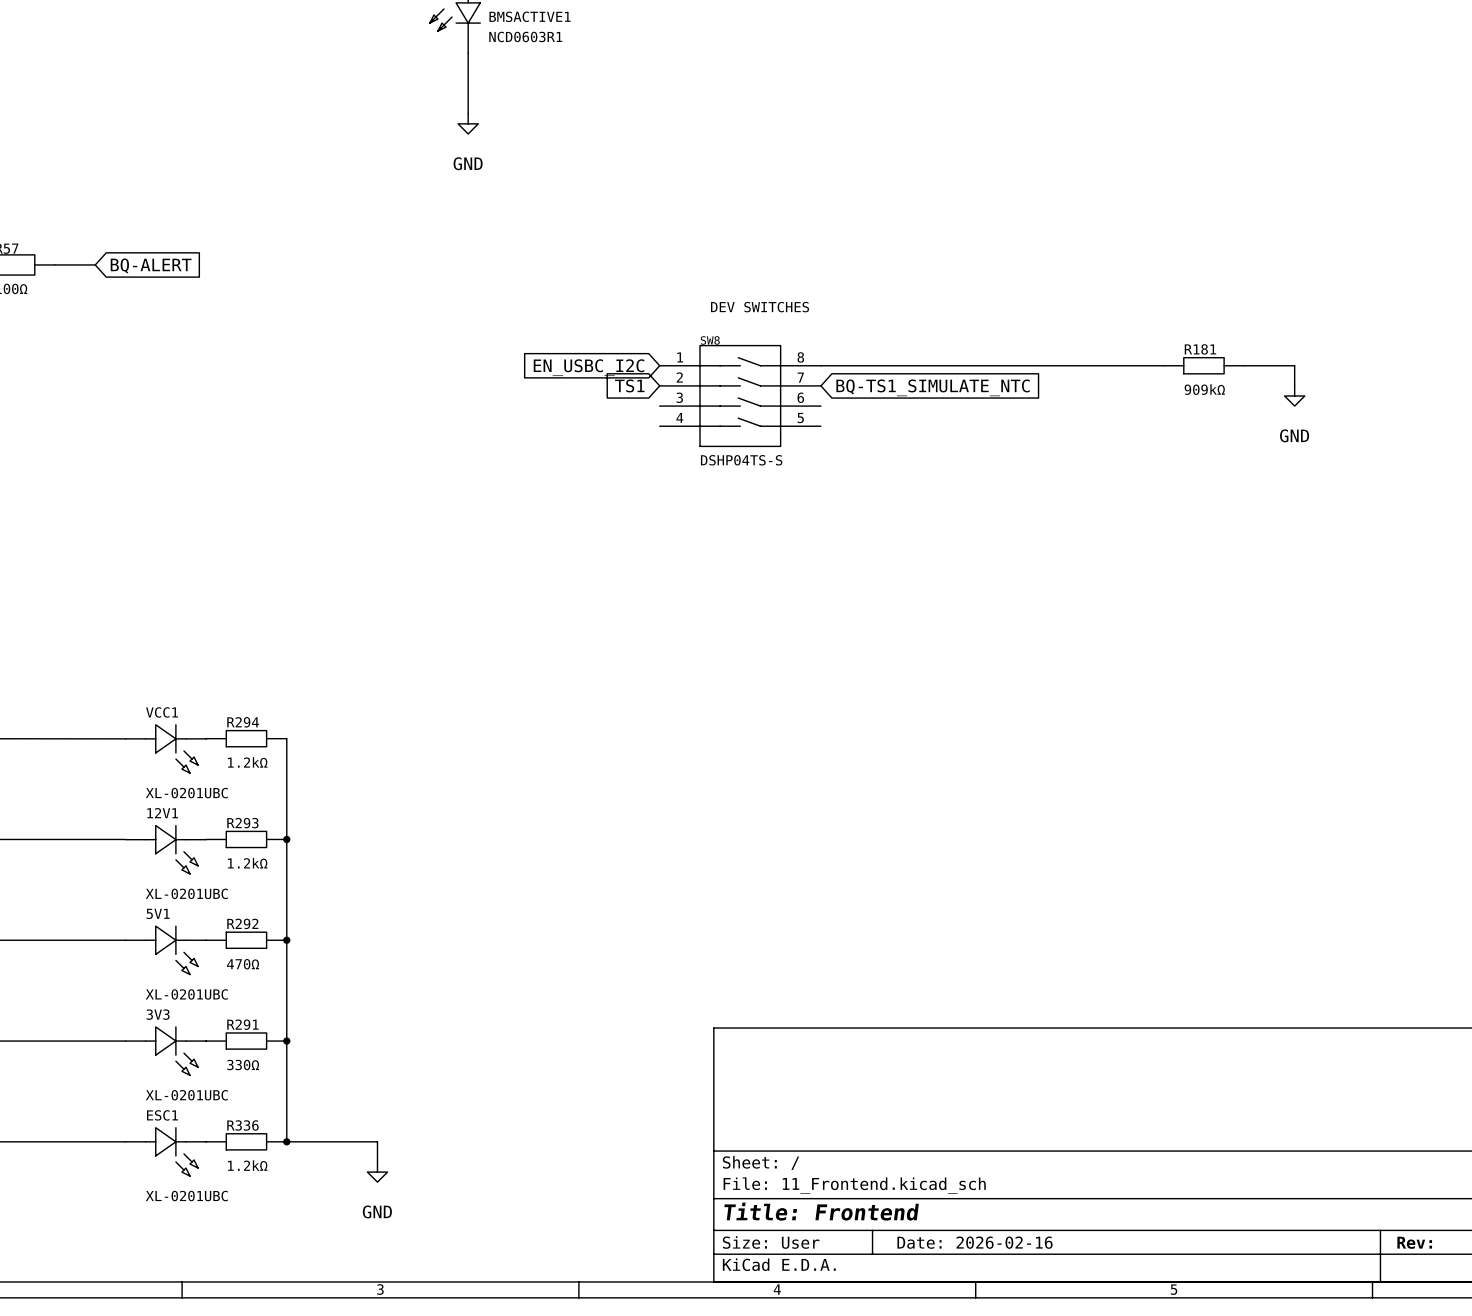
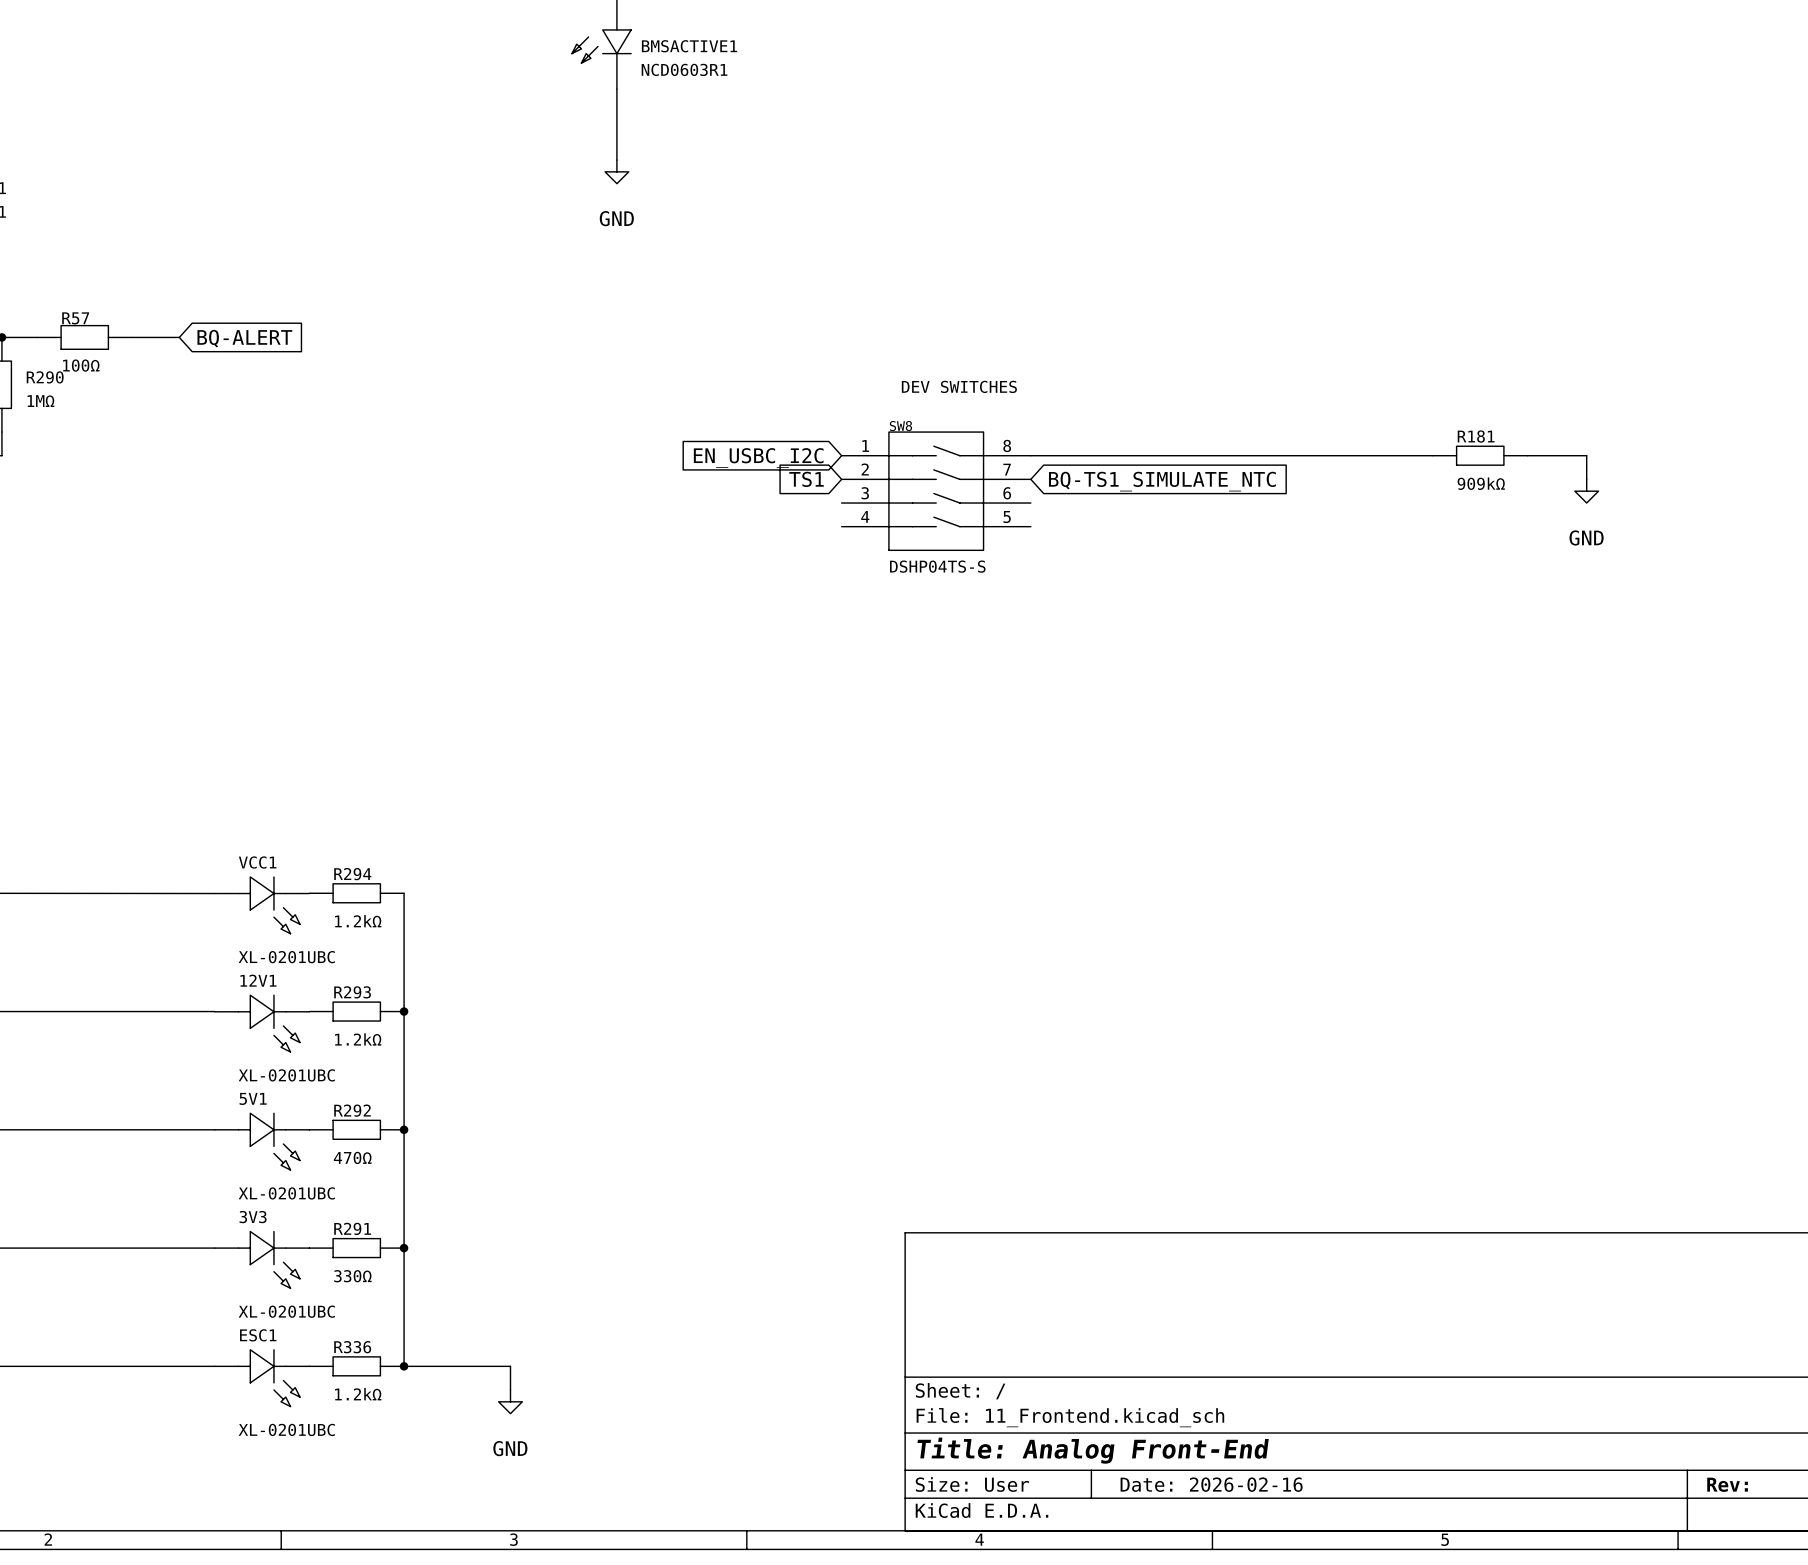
title block: Title: Frontend (821, 1211) -> Title: Analog Front-End (1093, 1450)

